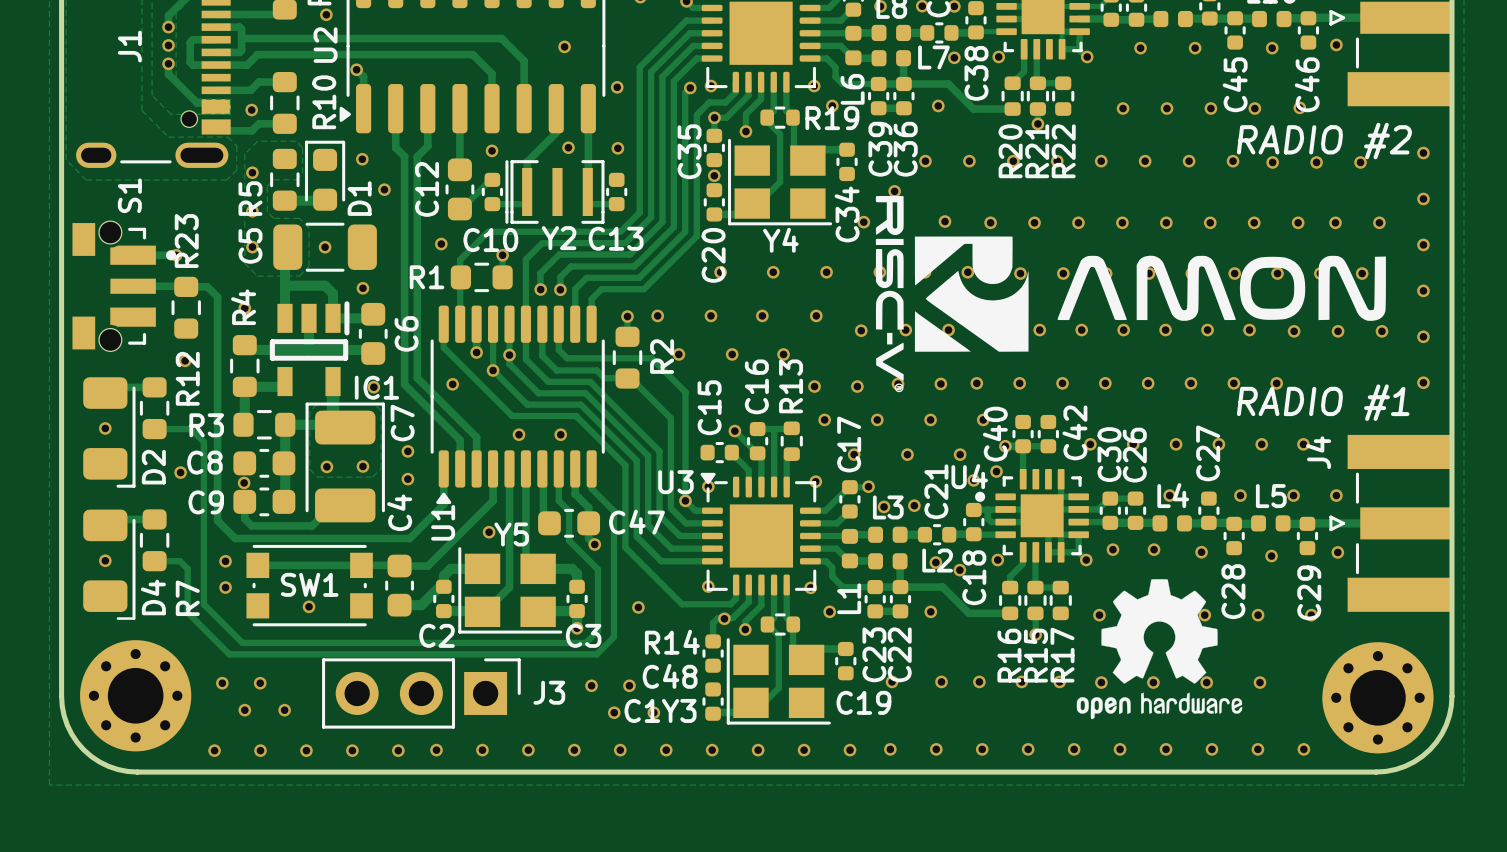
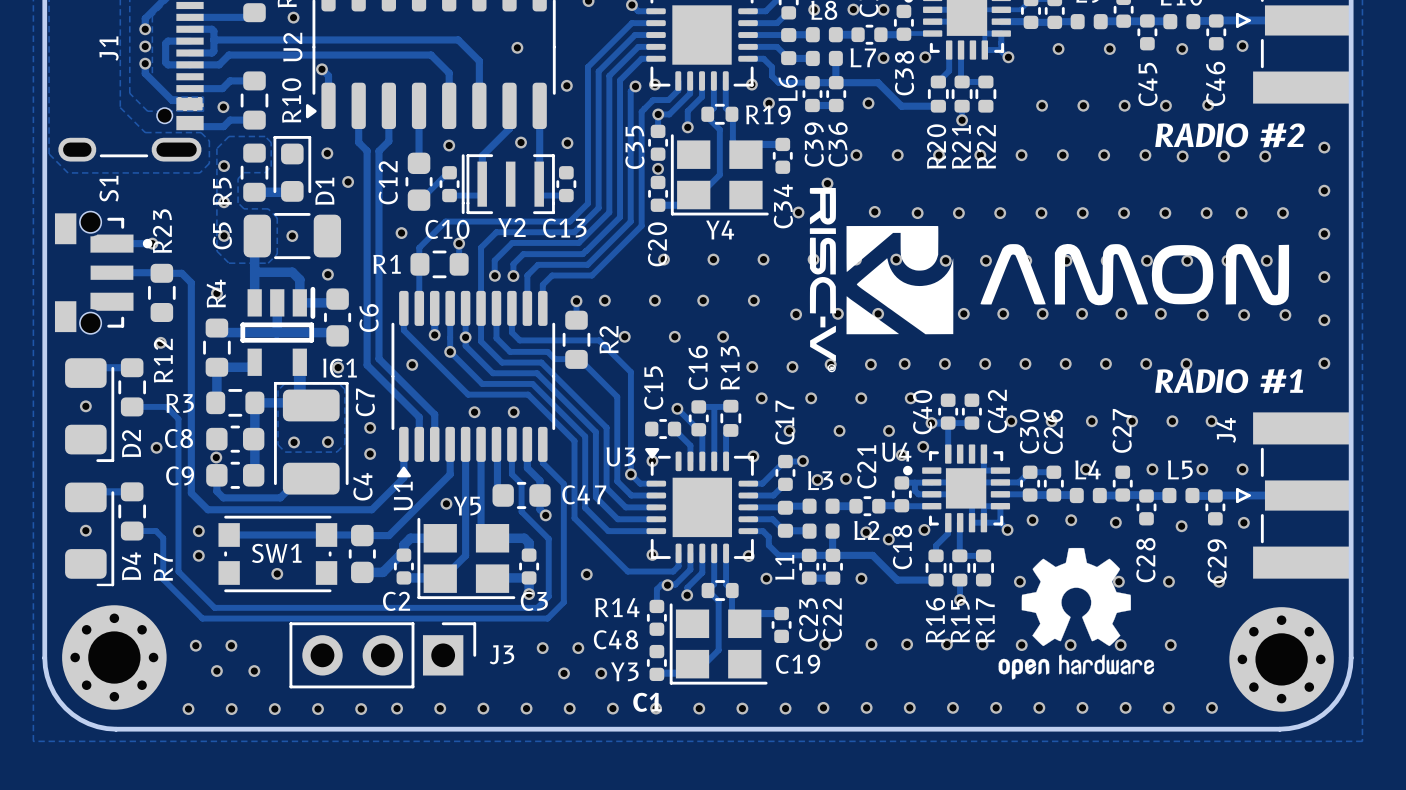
C1 name position: C1 (642, 710) -> C1 (647, 702)

